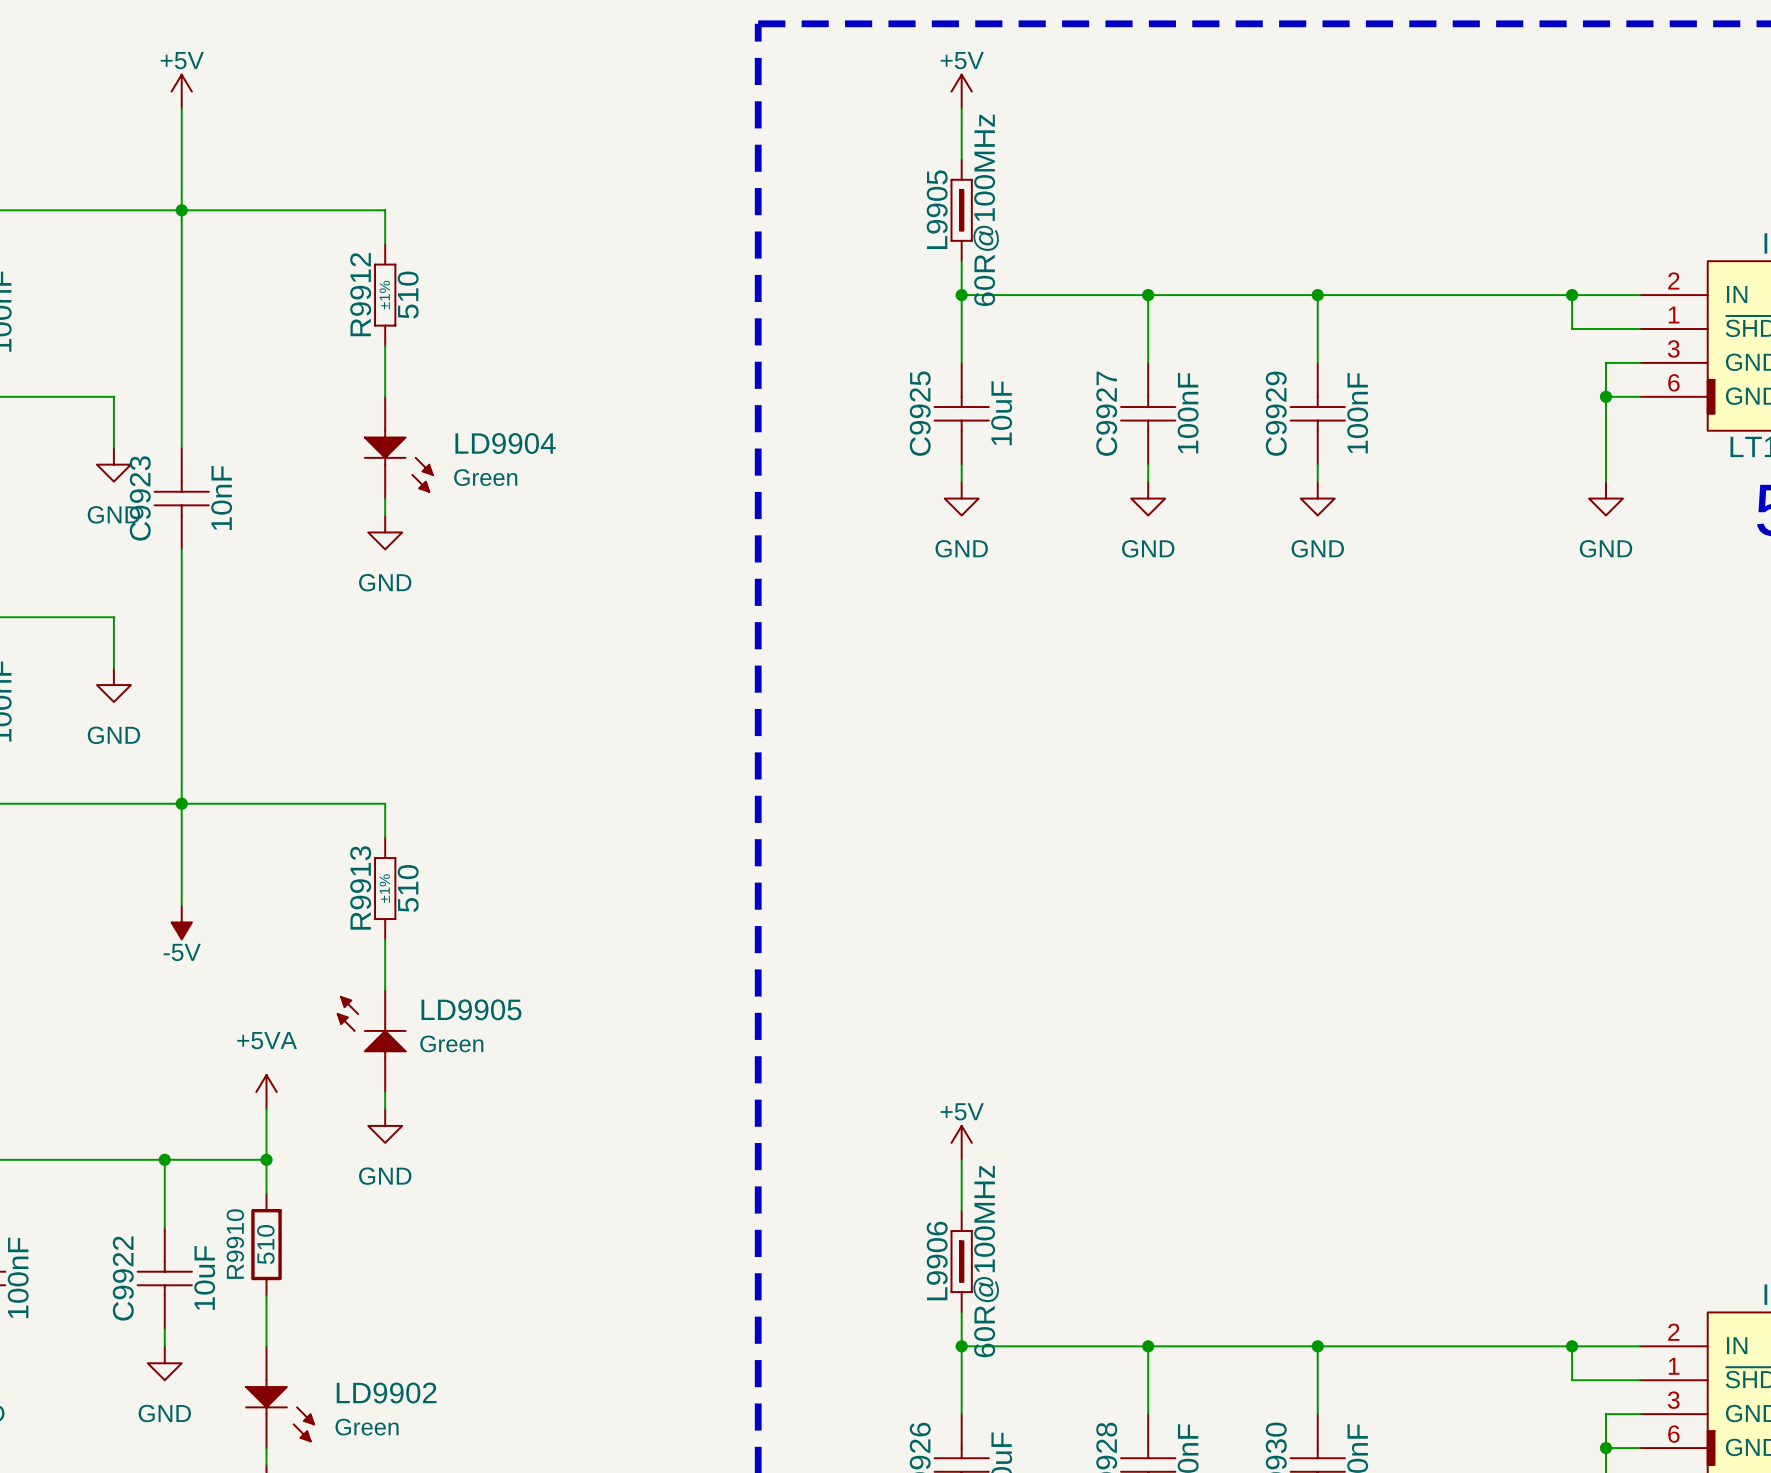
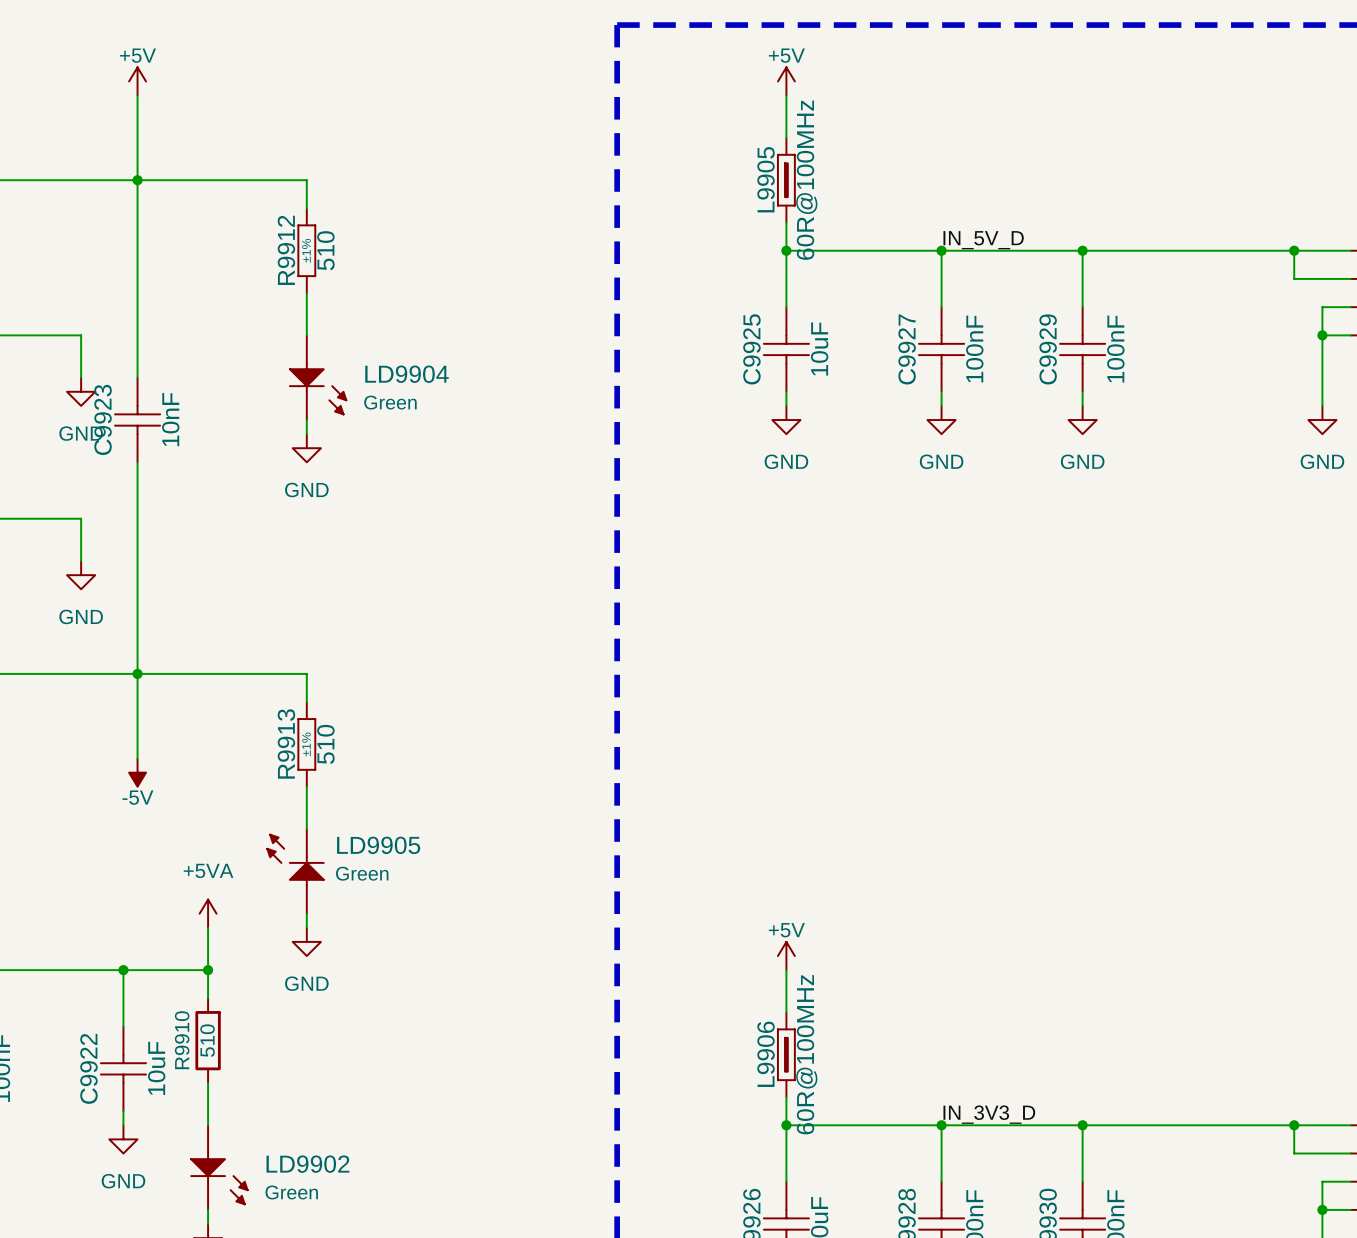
label: none -> IN_5V_D (983, 240)
label: none -> IN_3V3_D (989, 1114)

